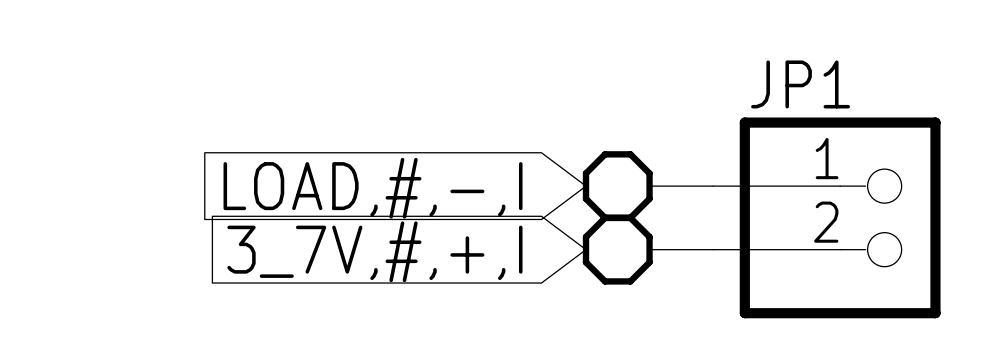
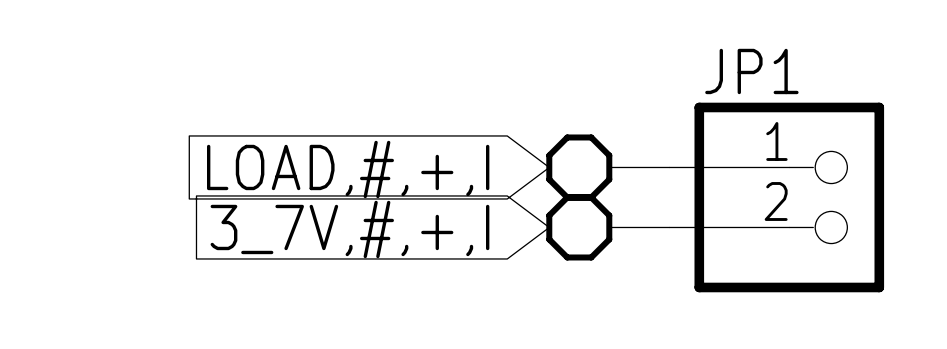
global label: LOAD,#,-,I (373, 188) -> LOAD,#,+,I (348, 169)

